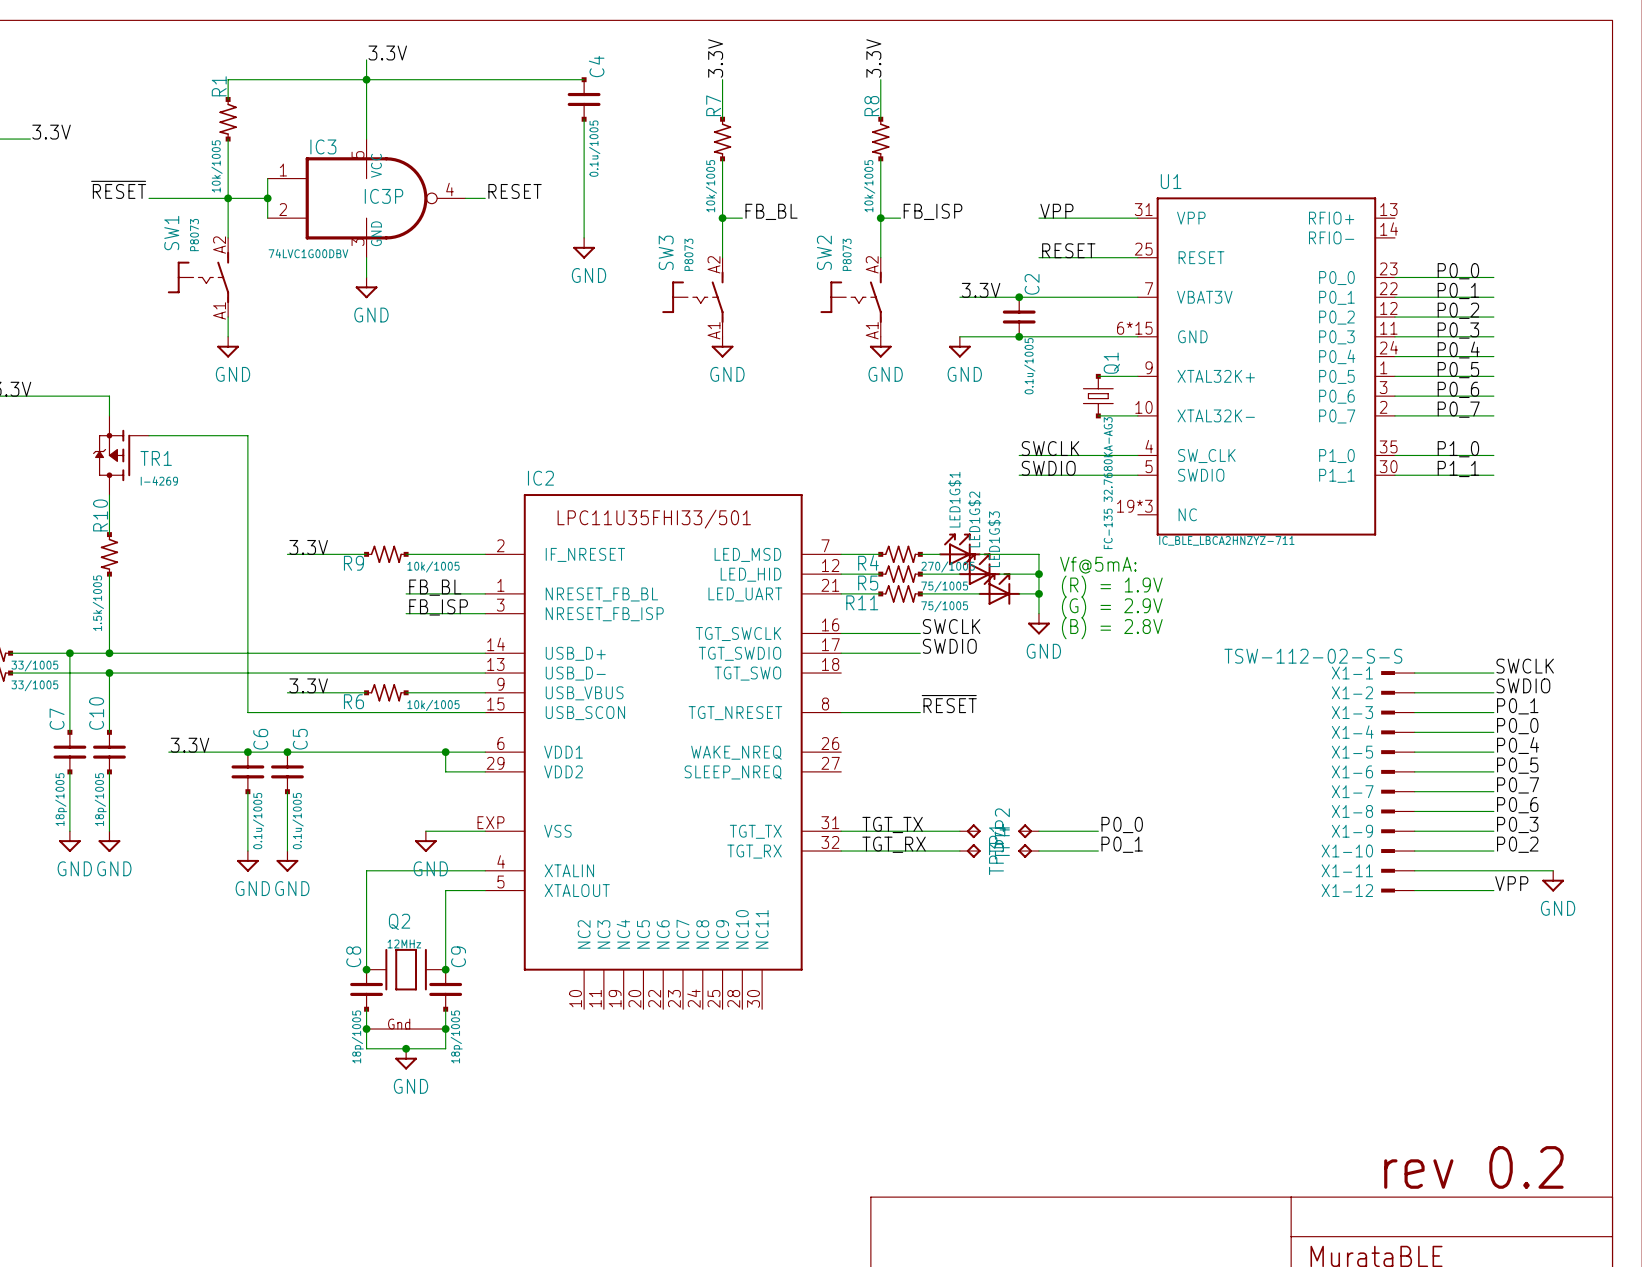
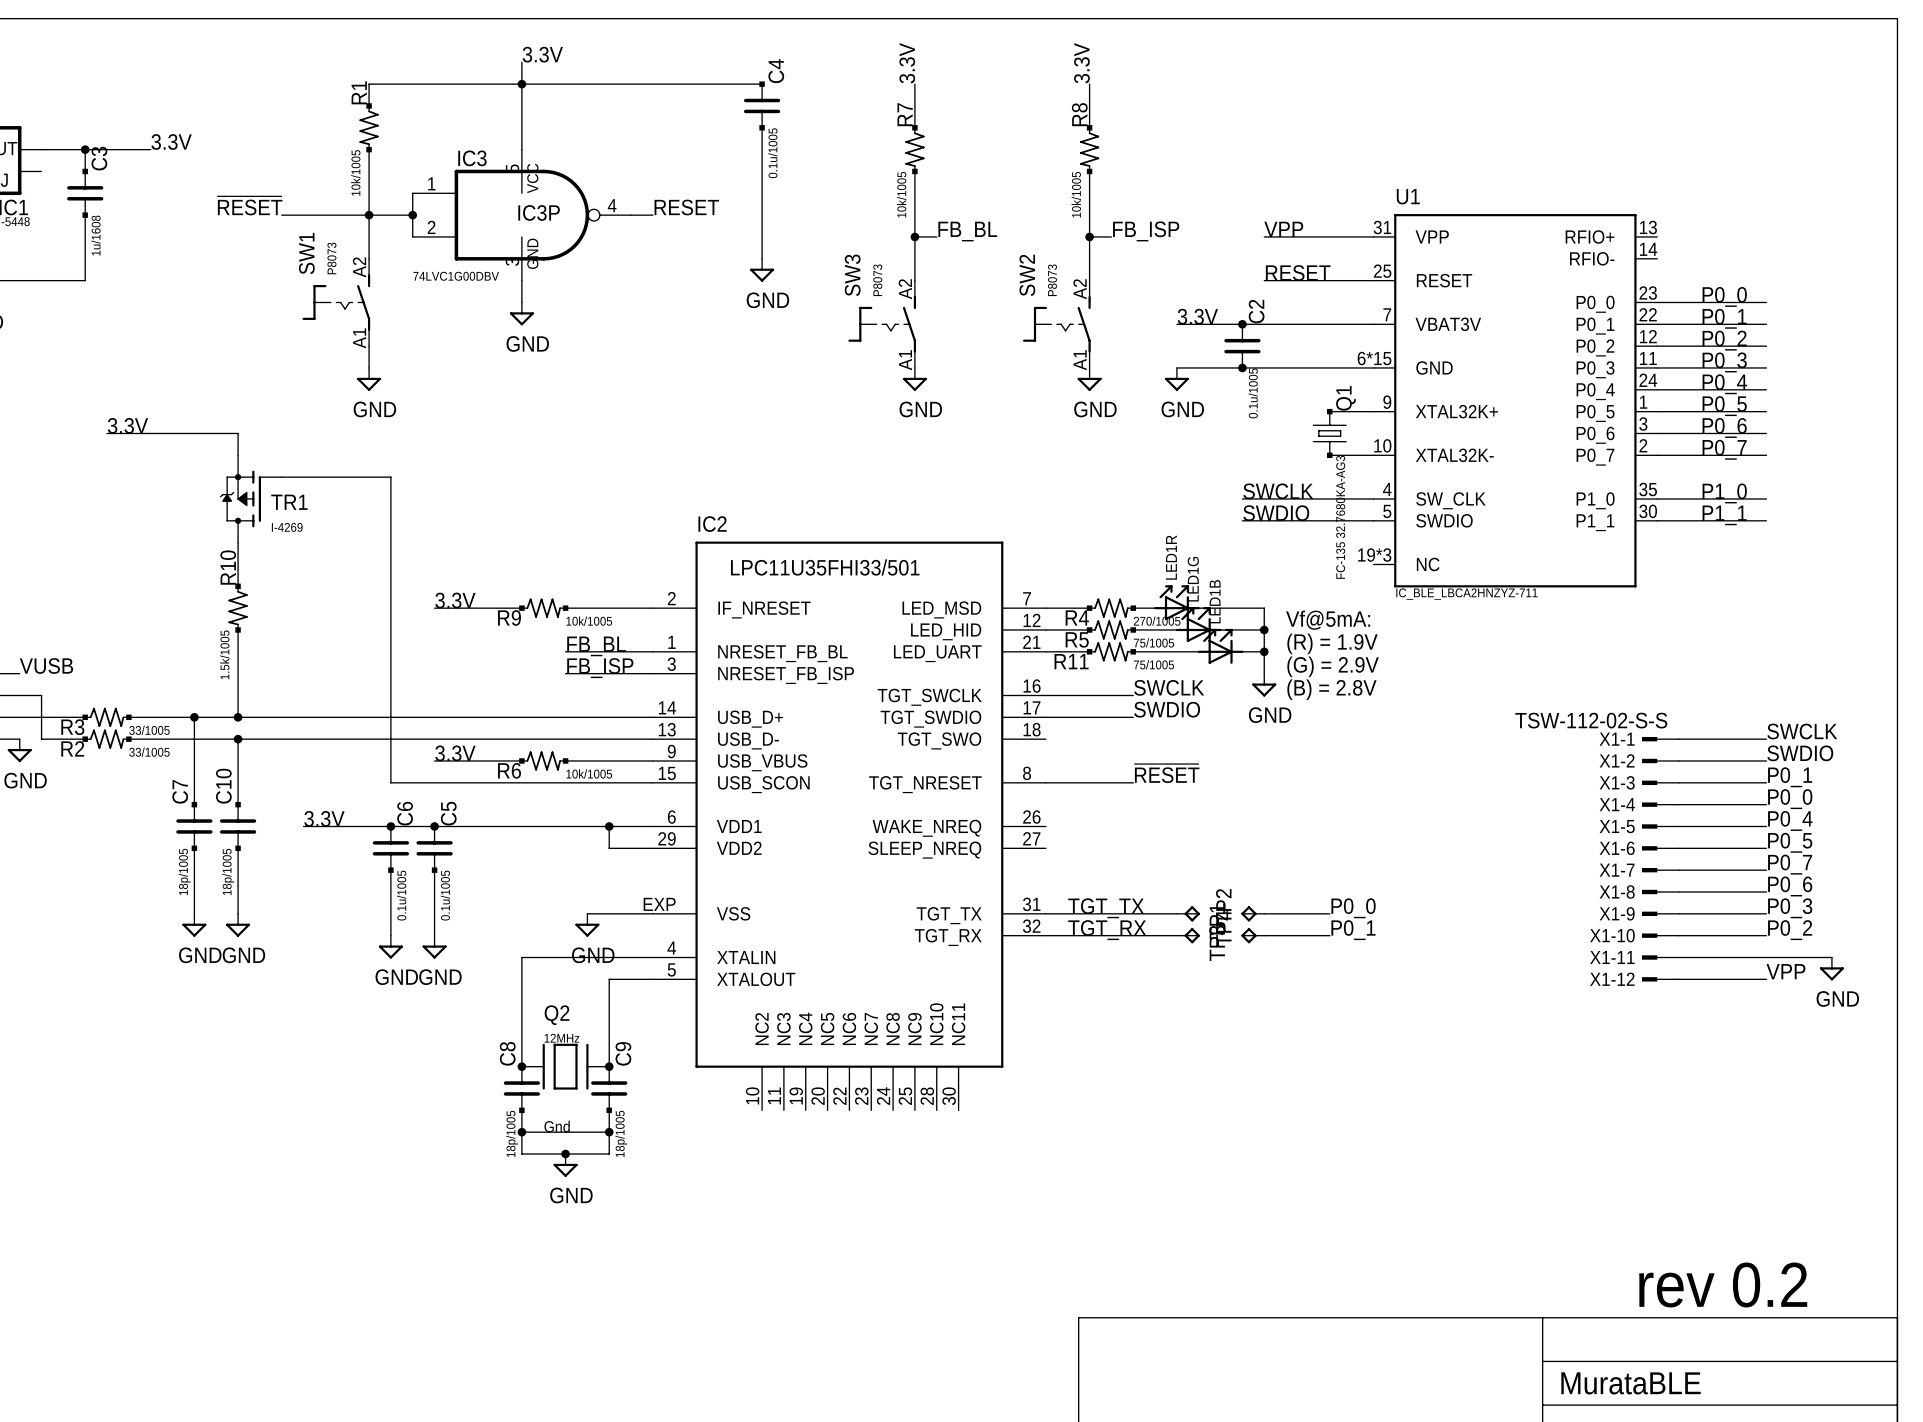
LED1G$1 name: LED1G$1 (954, 499) -> LED1R (1171, 557)
LED1G$2 name: LED1G$2 (974, 519) -> LED1G (1193, 579)
LED1G$3 name: LED1G$3 (994, 539) -> LED1B (1215, 601)

